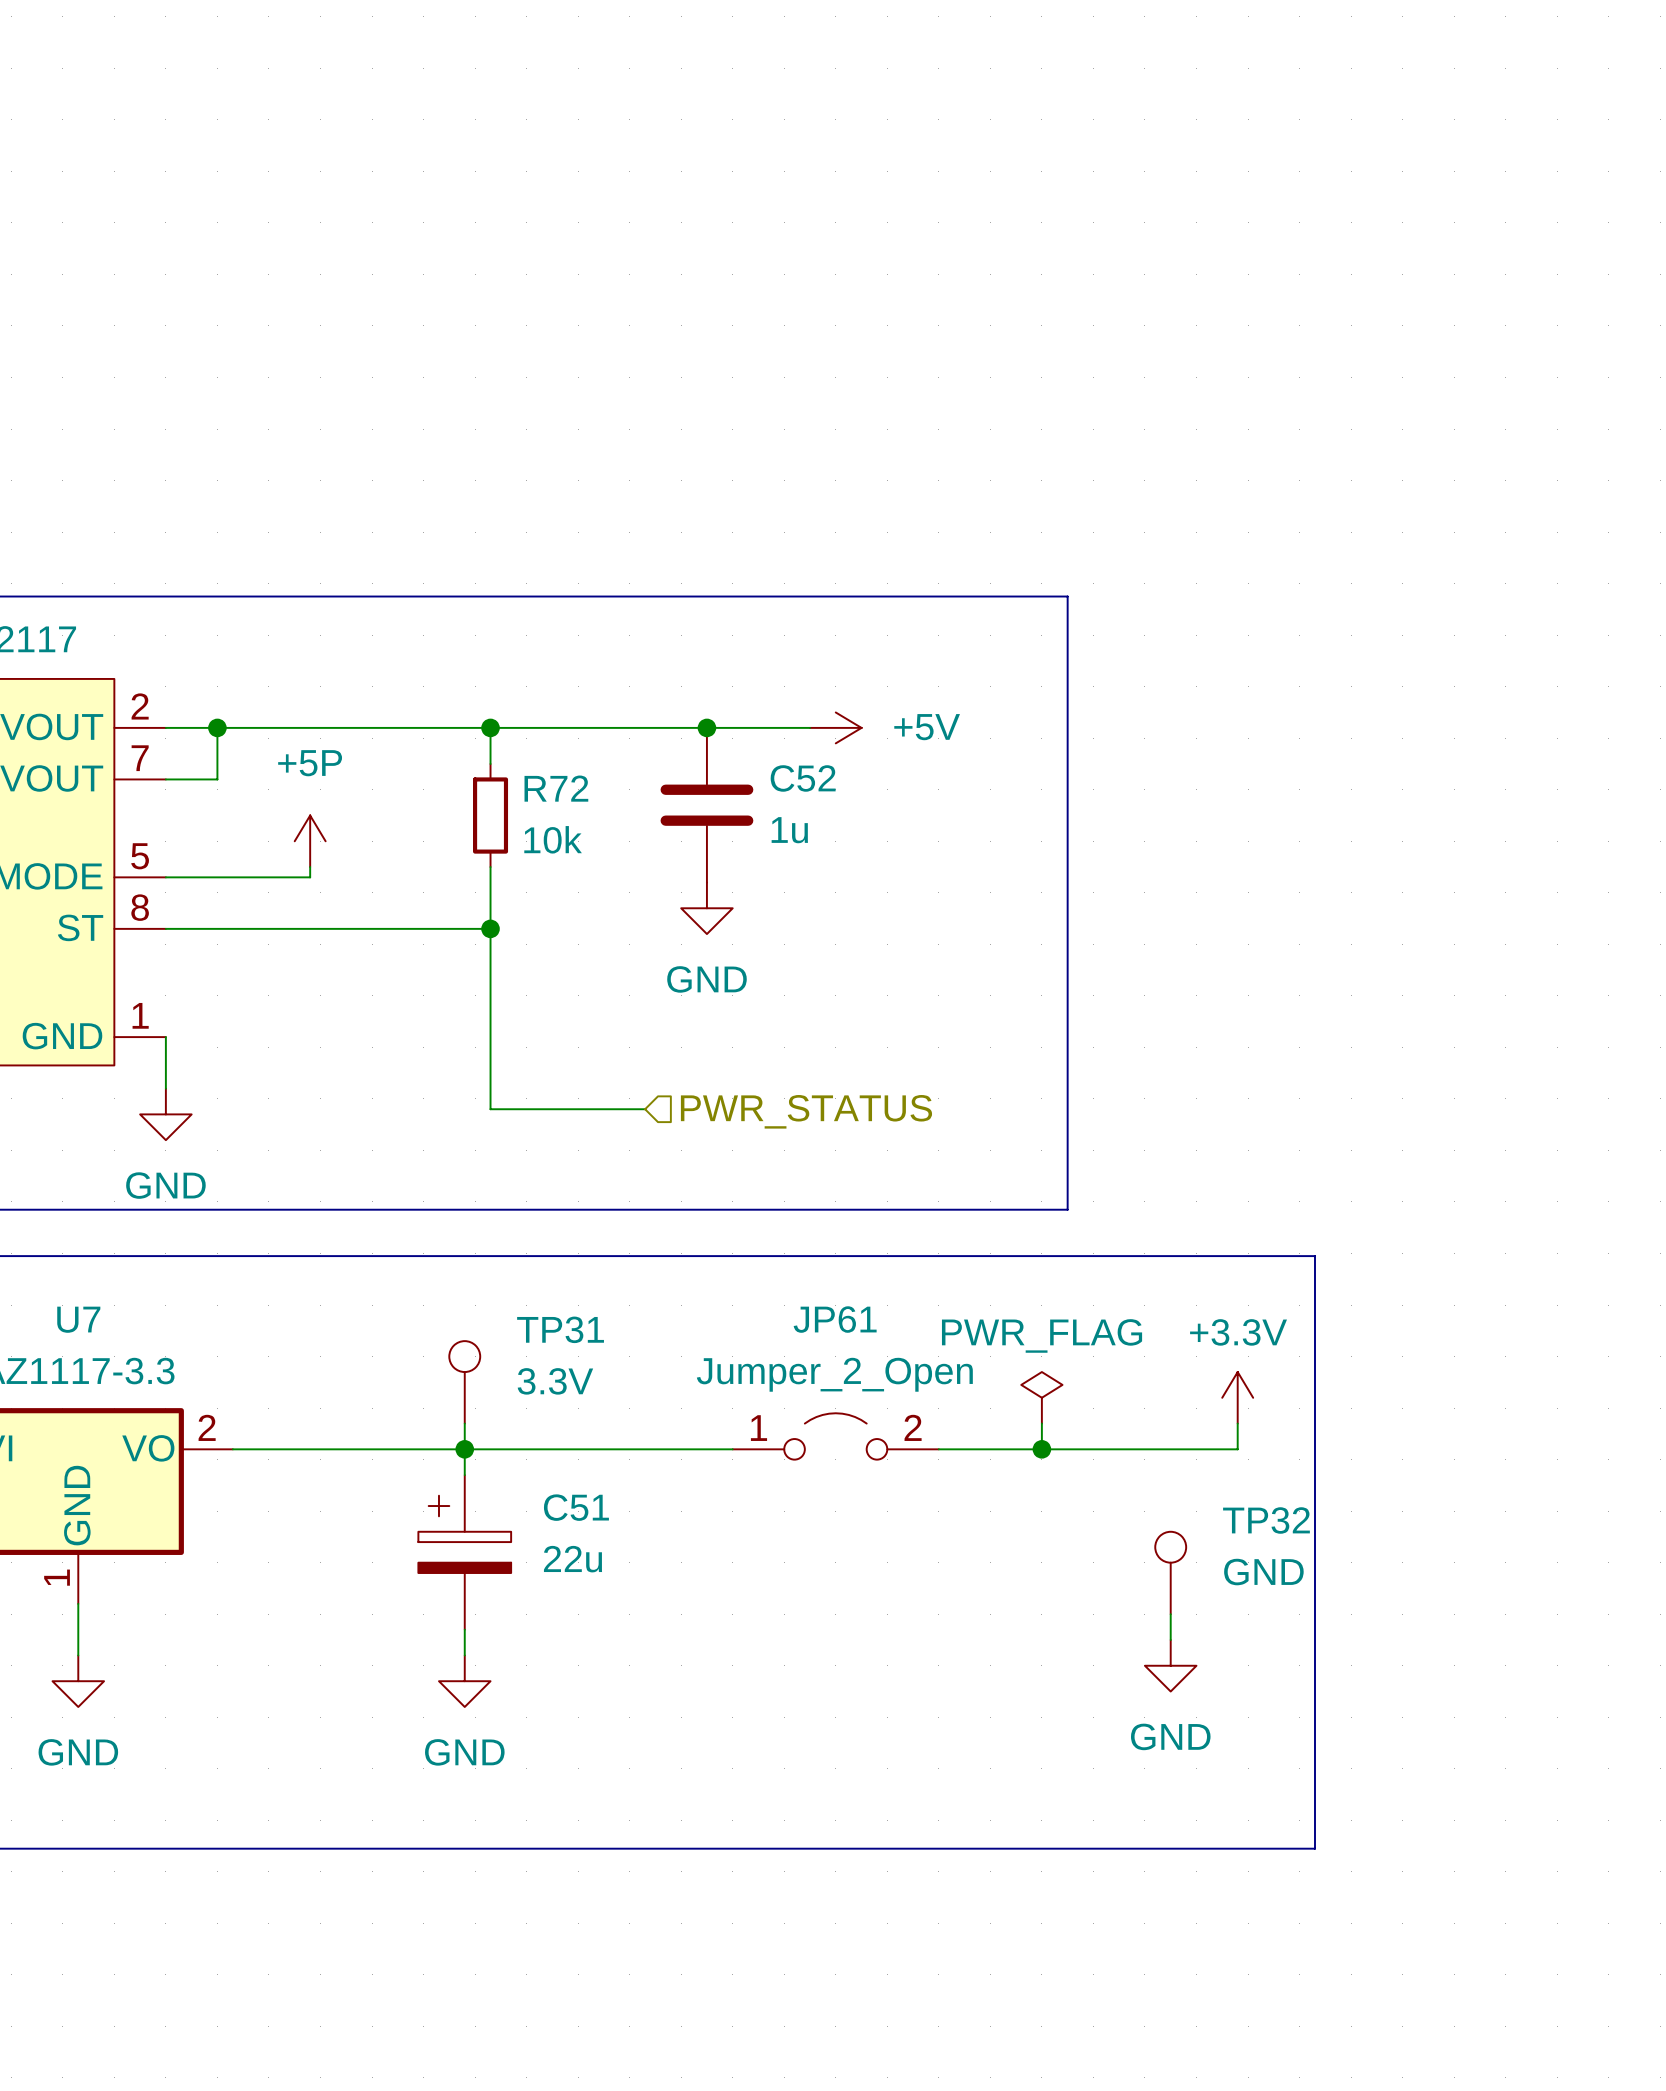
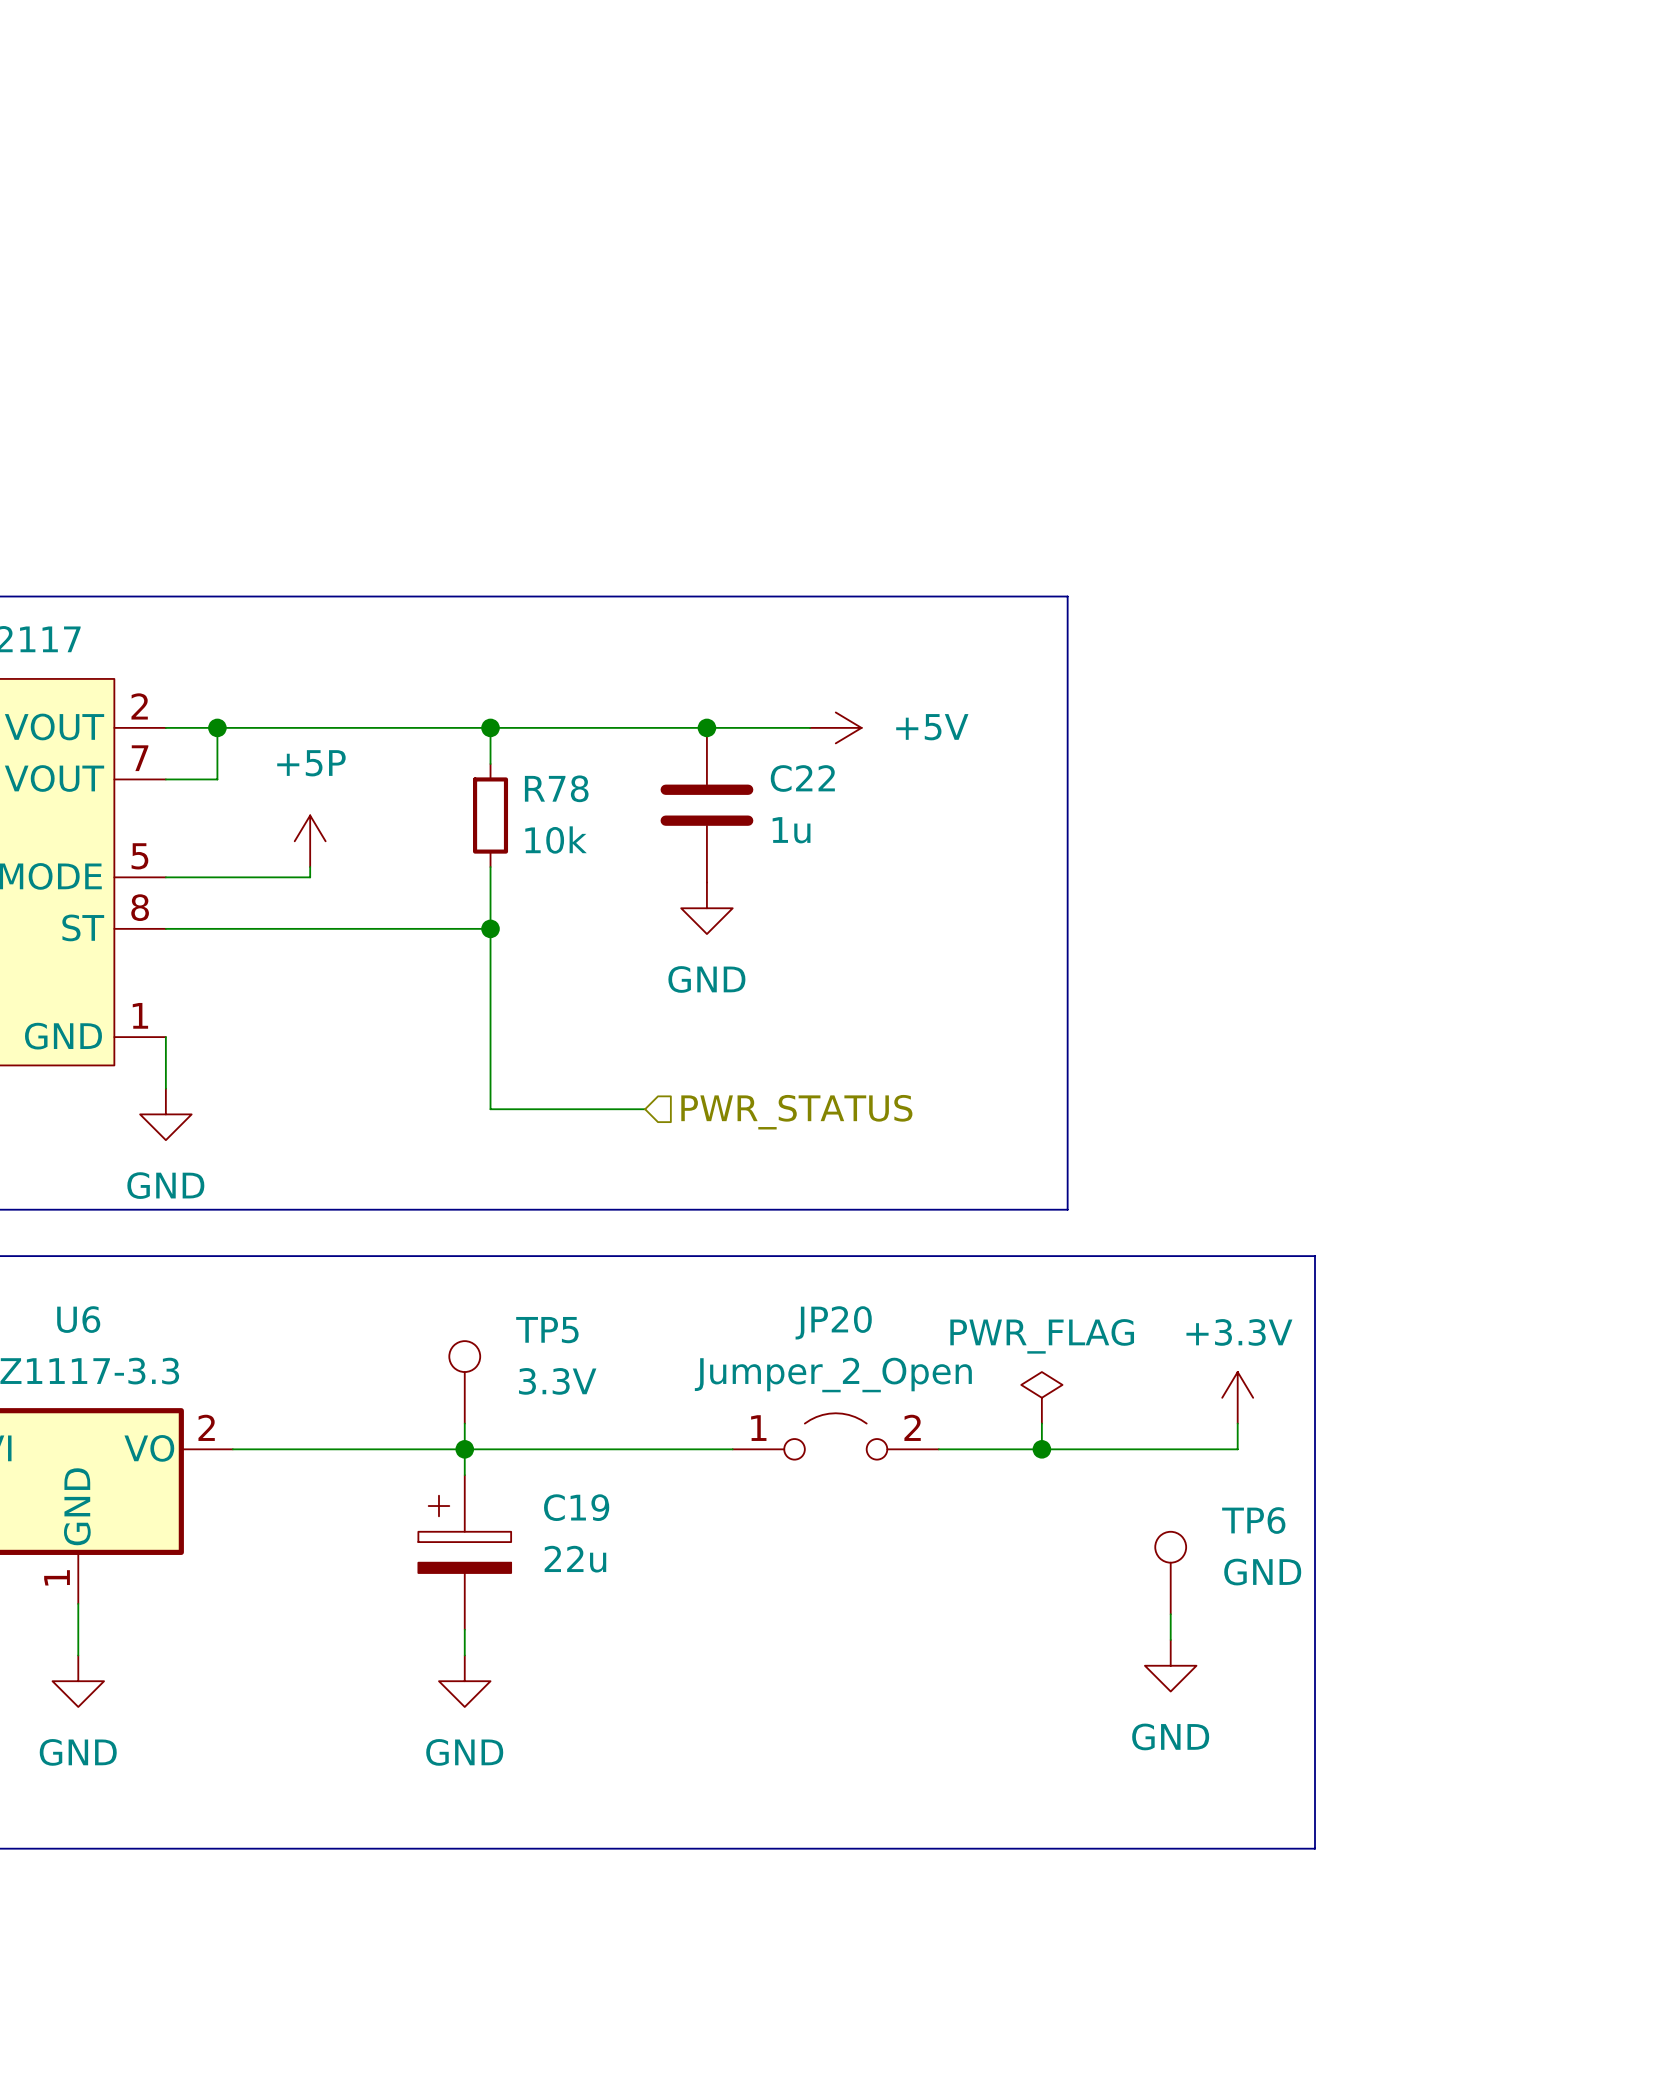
C52 name: C52 (803, 778) -> C22 (802, 778)
R72 name: R72 (556, 788) -> R78 (556, 788)
U7 name: U7 (78, 1319) -> U6 (78, 1319)
JP61 name: JP61 (835, 1319) -> JP20 (833, 1322)
TP31 name: TP31 (560, 1329) -> TP5 (547, 1330)
C51 name: C51 (576, 1507) -> C19 (576, 1507)
TP32 name: TP32 (1266, 1520) -> TP6 (1253, 1520)

